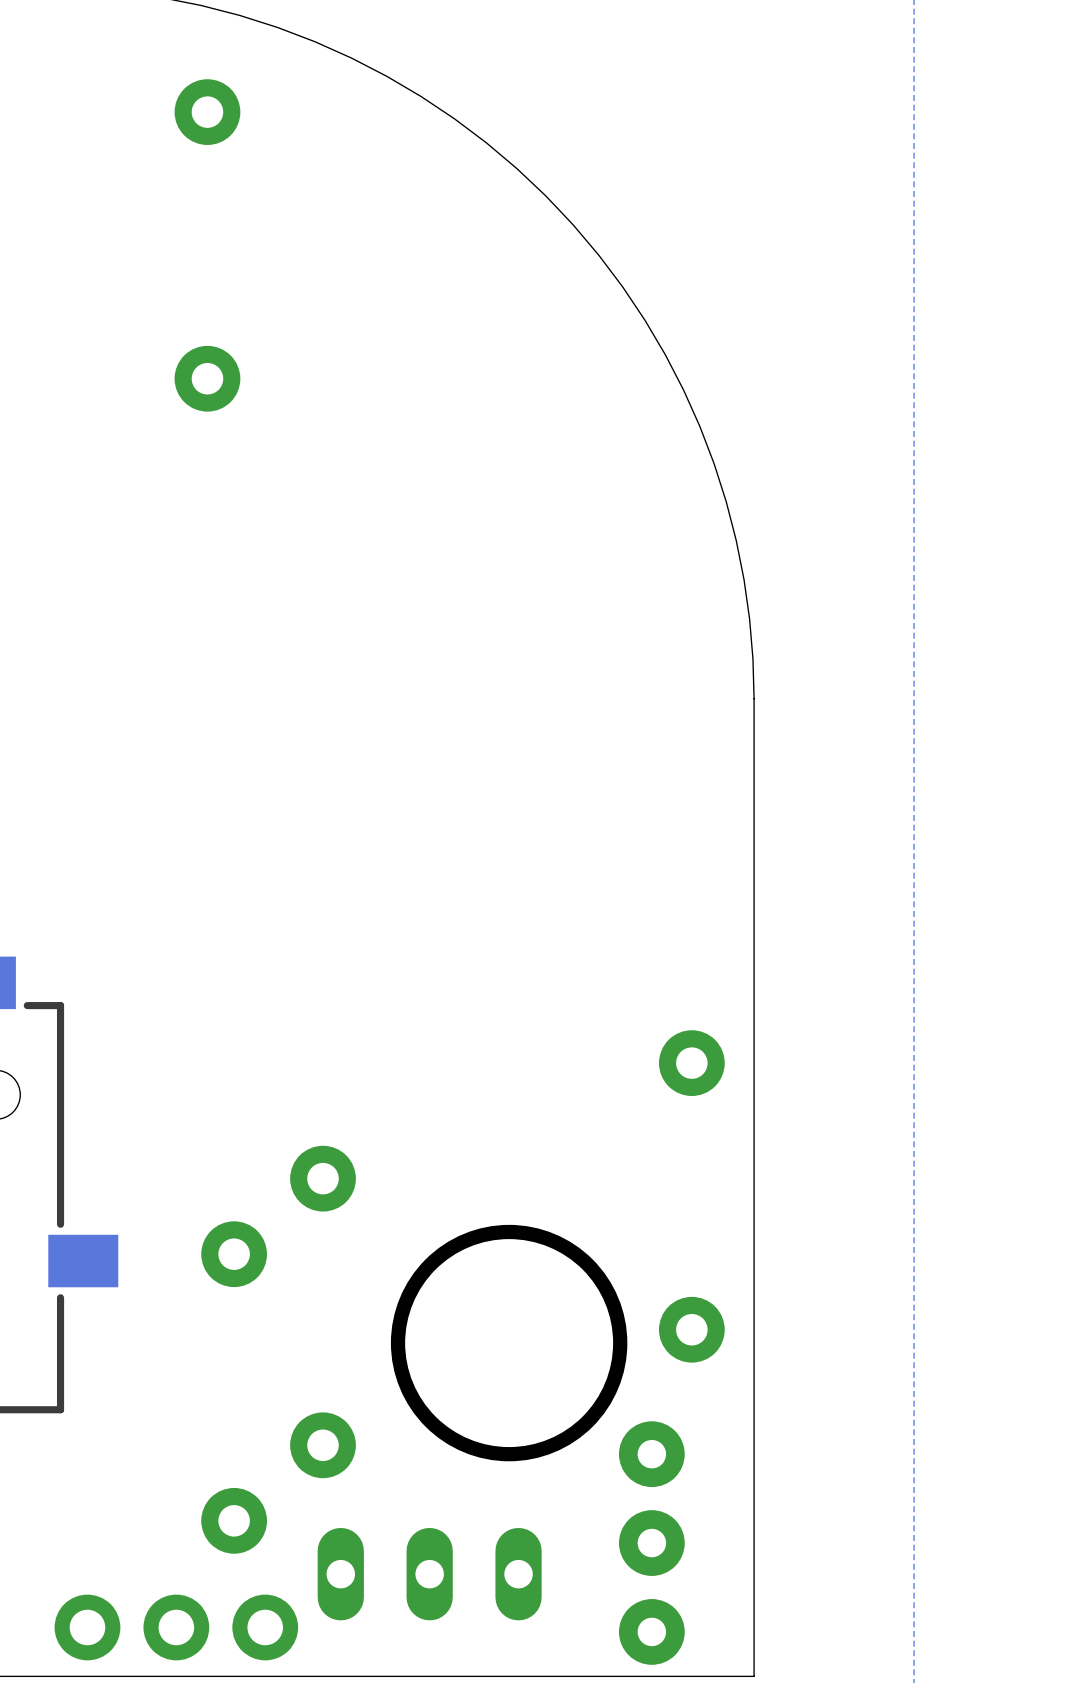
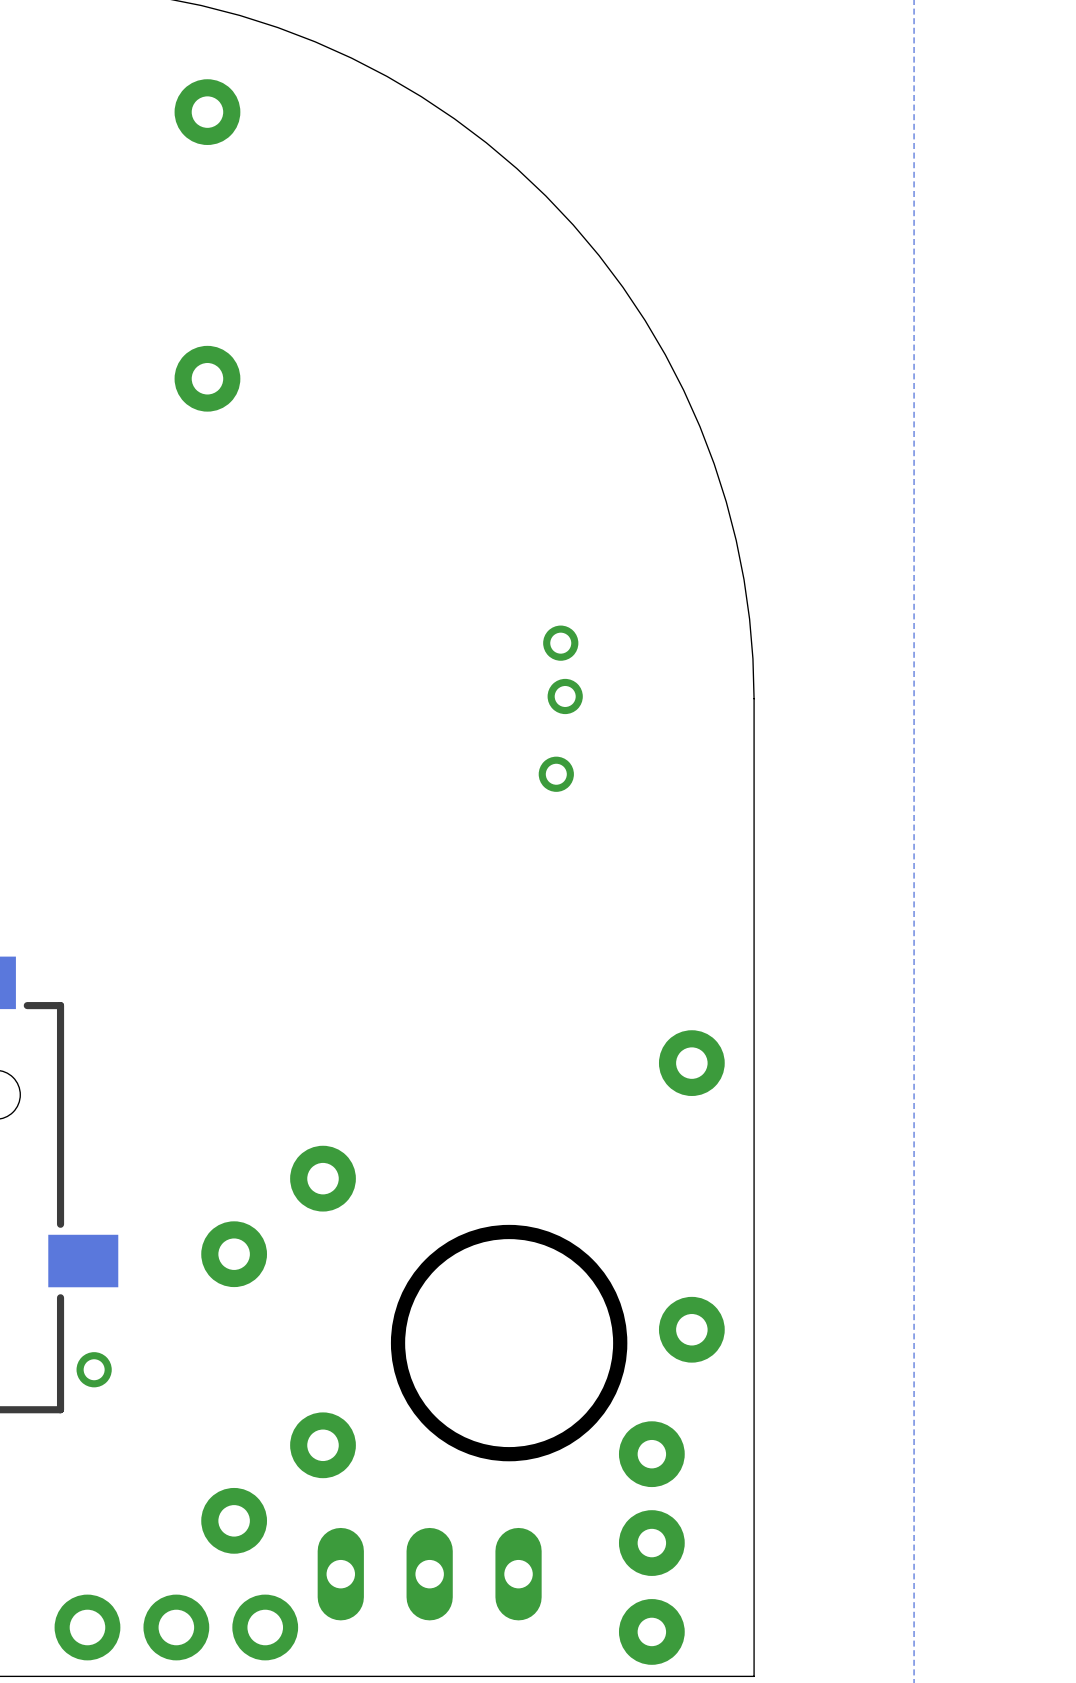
via: none -> (560, 643)
via: none -> (565, 696)
via: none -> (556, 774)
via: none -> (94, 1369)

